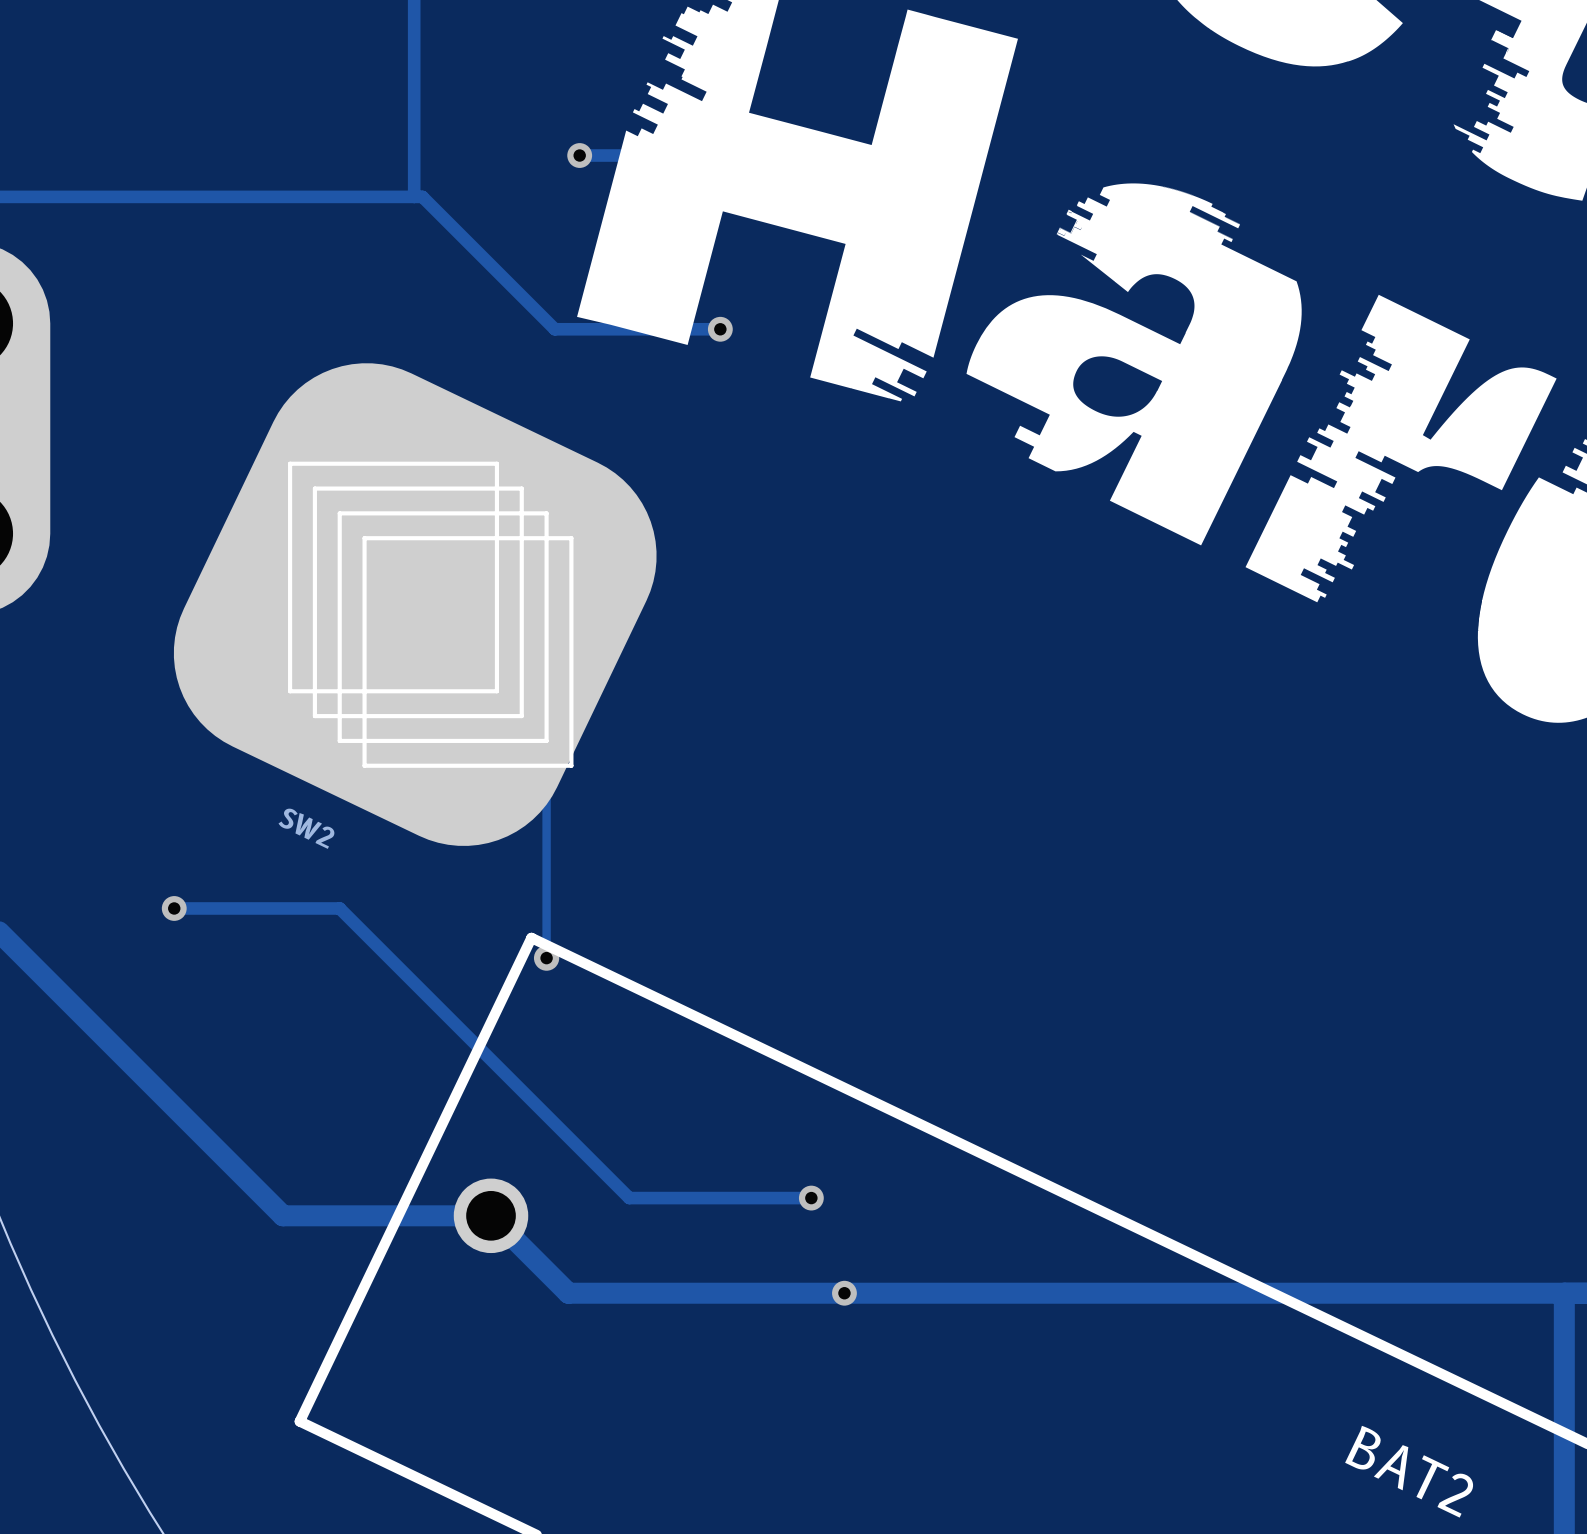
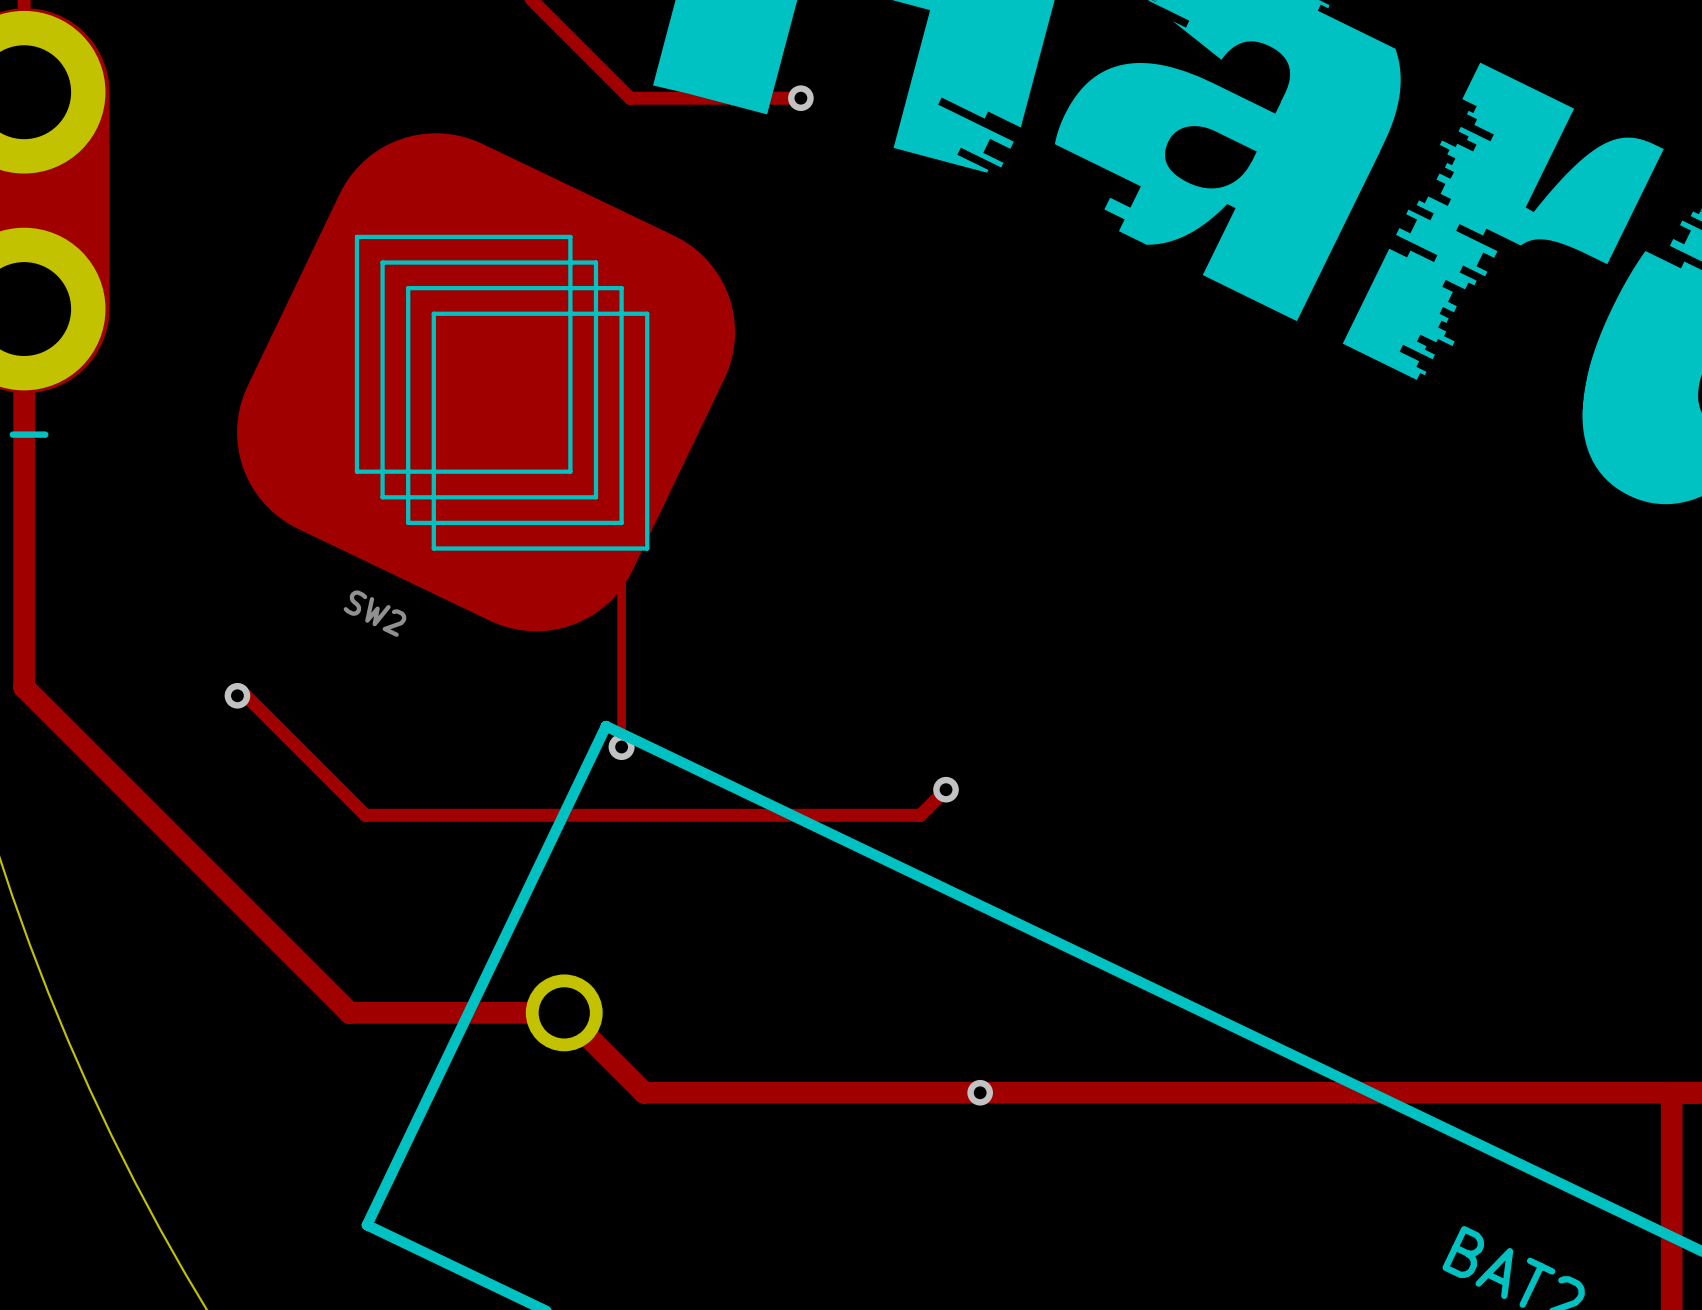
track: (182, 908) (339, 908) (629, 1198) (811, 1198) -> (245, 695) (365, 815) (920, 815) (946, 789)
via: none -> (946, 789)
via: (811, 1198) -> none
via position: (844, 1293) -> (980, 1092)

